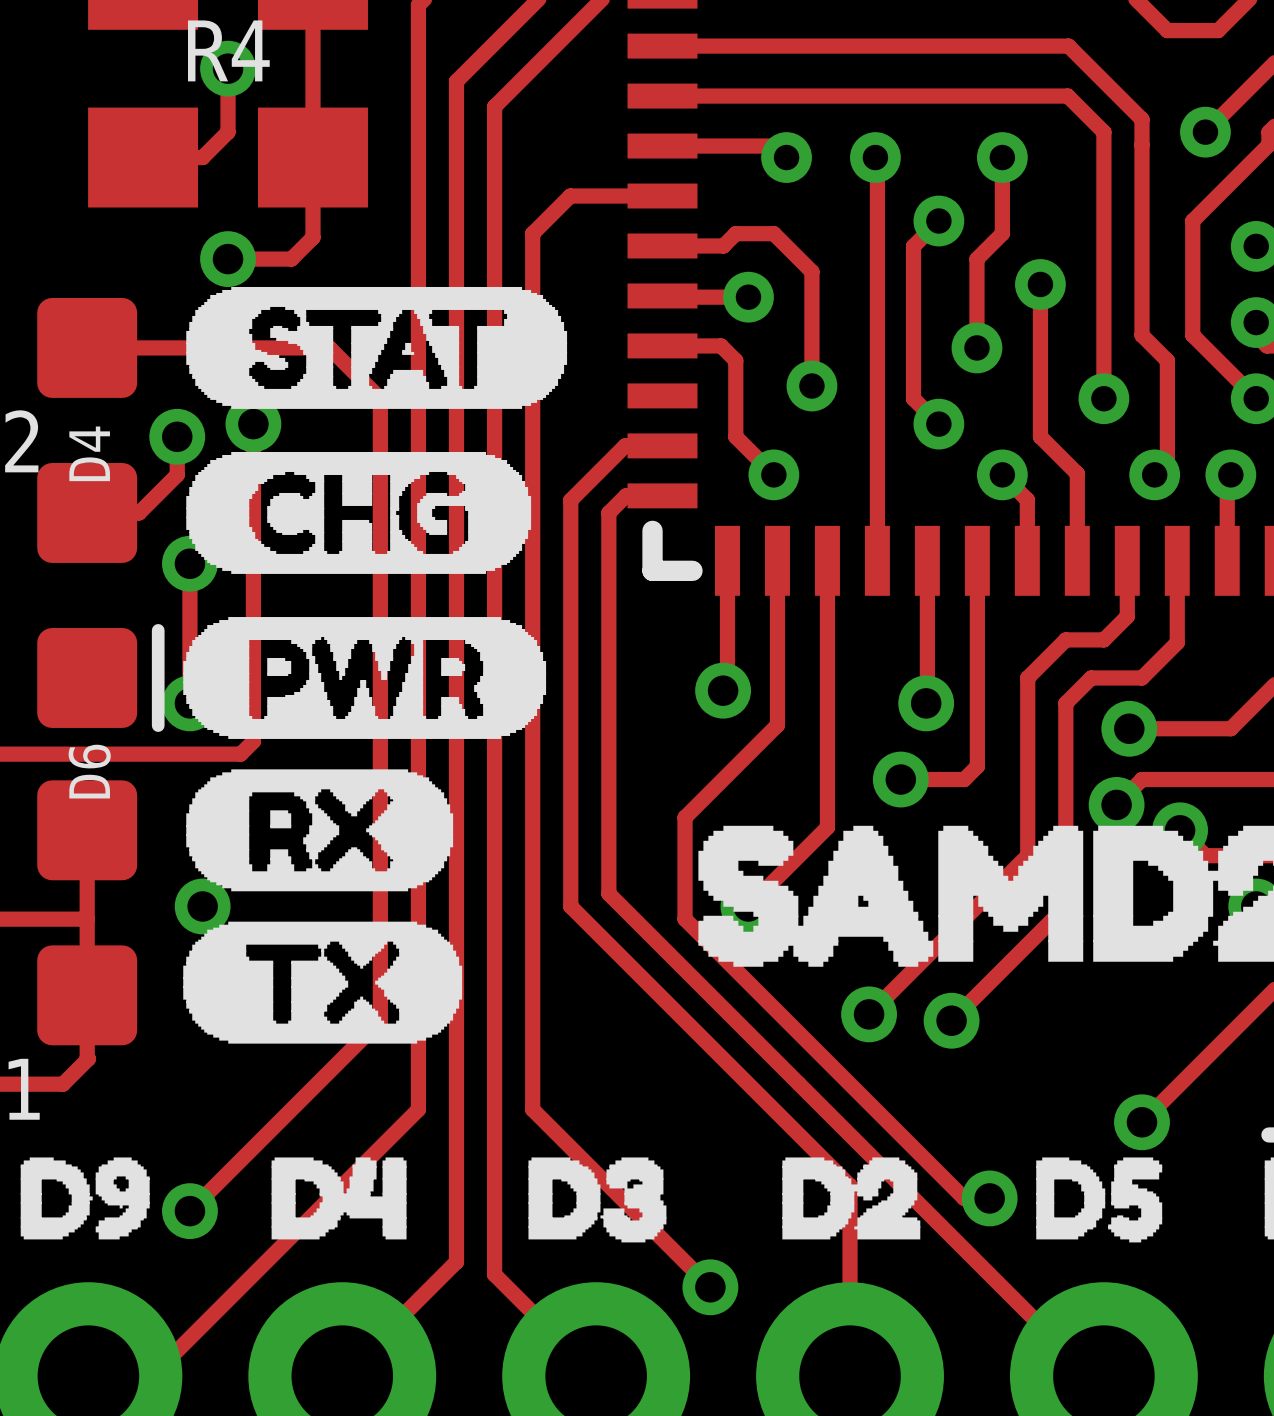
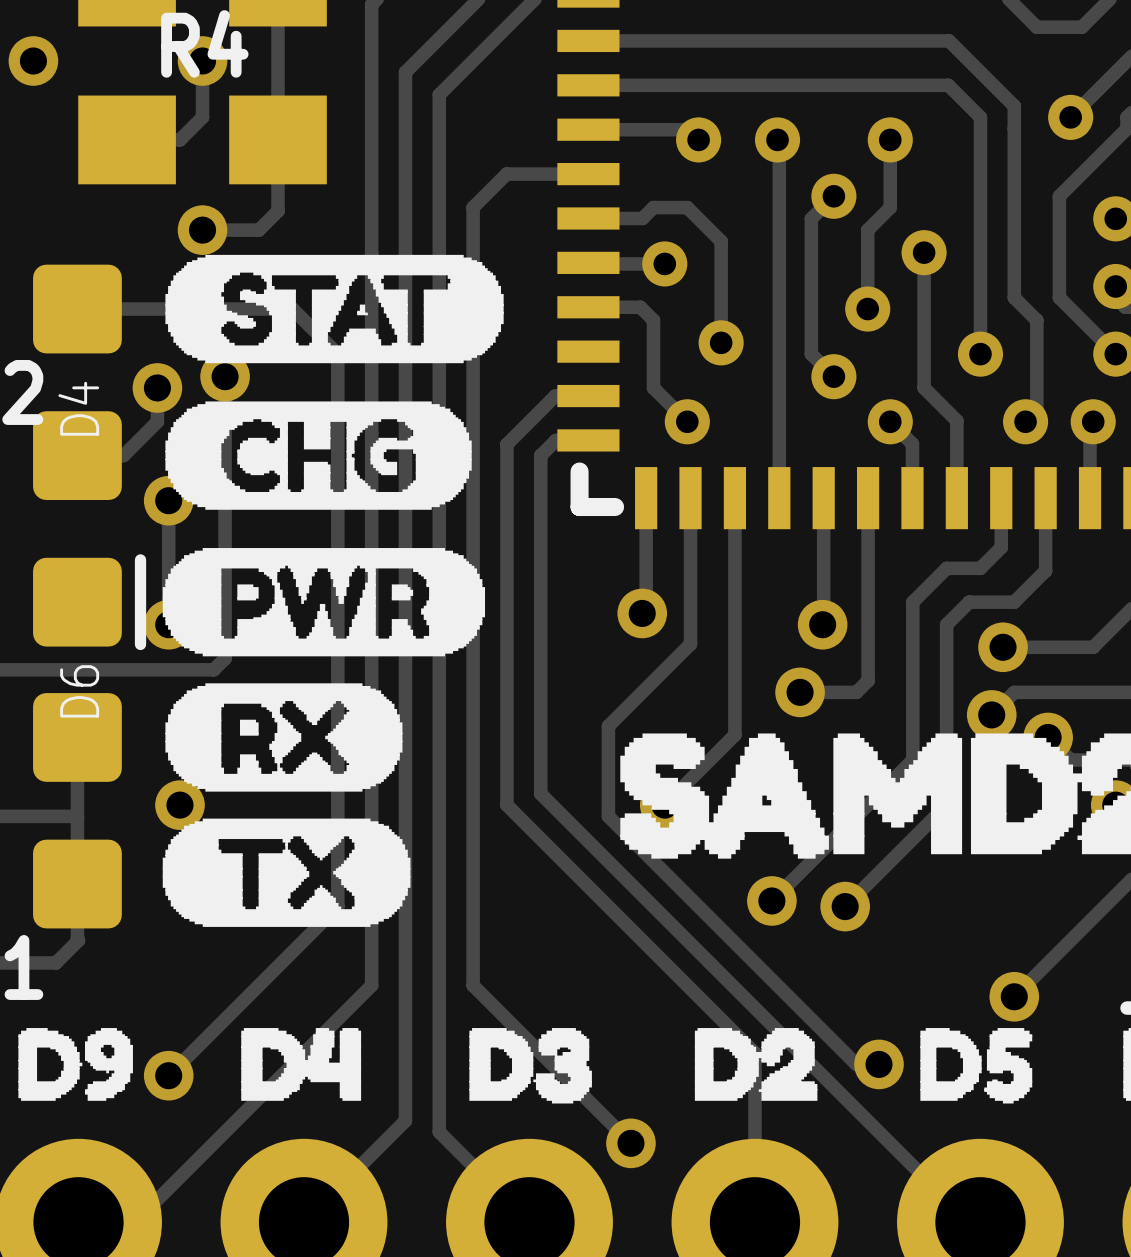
via: none -> (33, 61)

